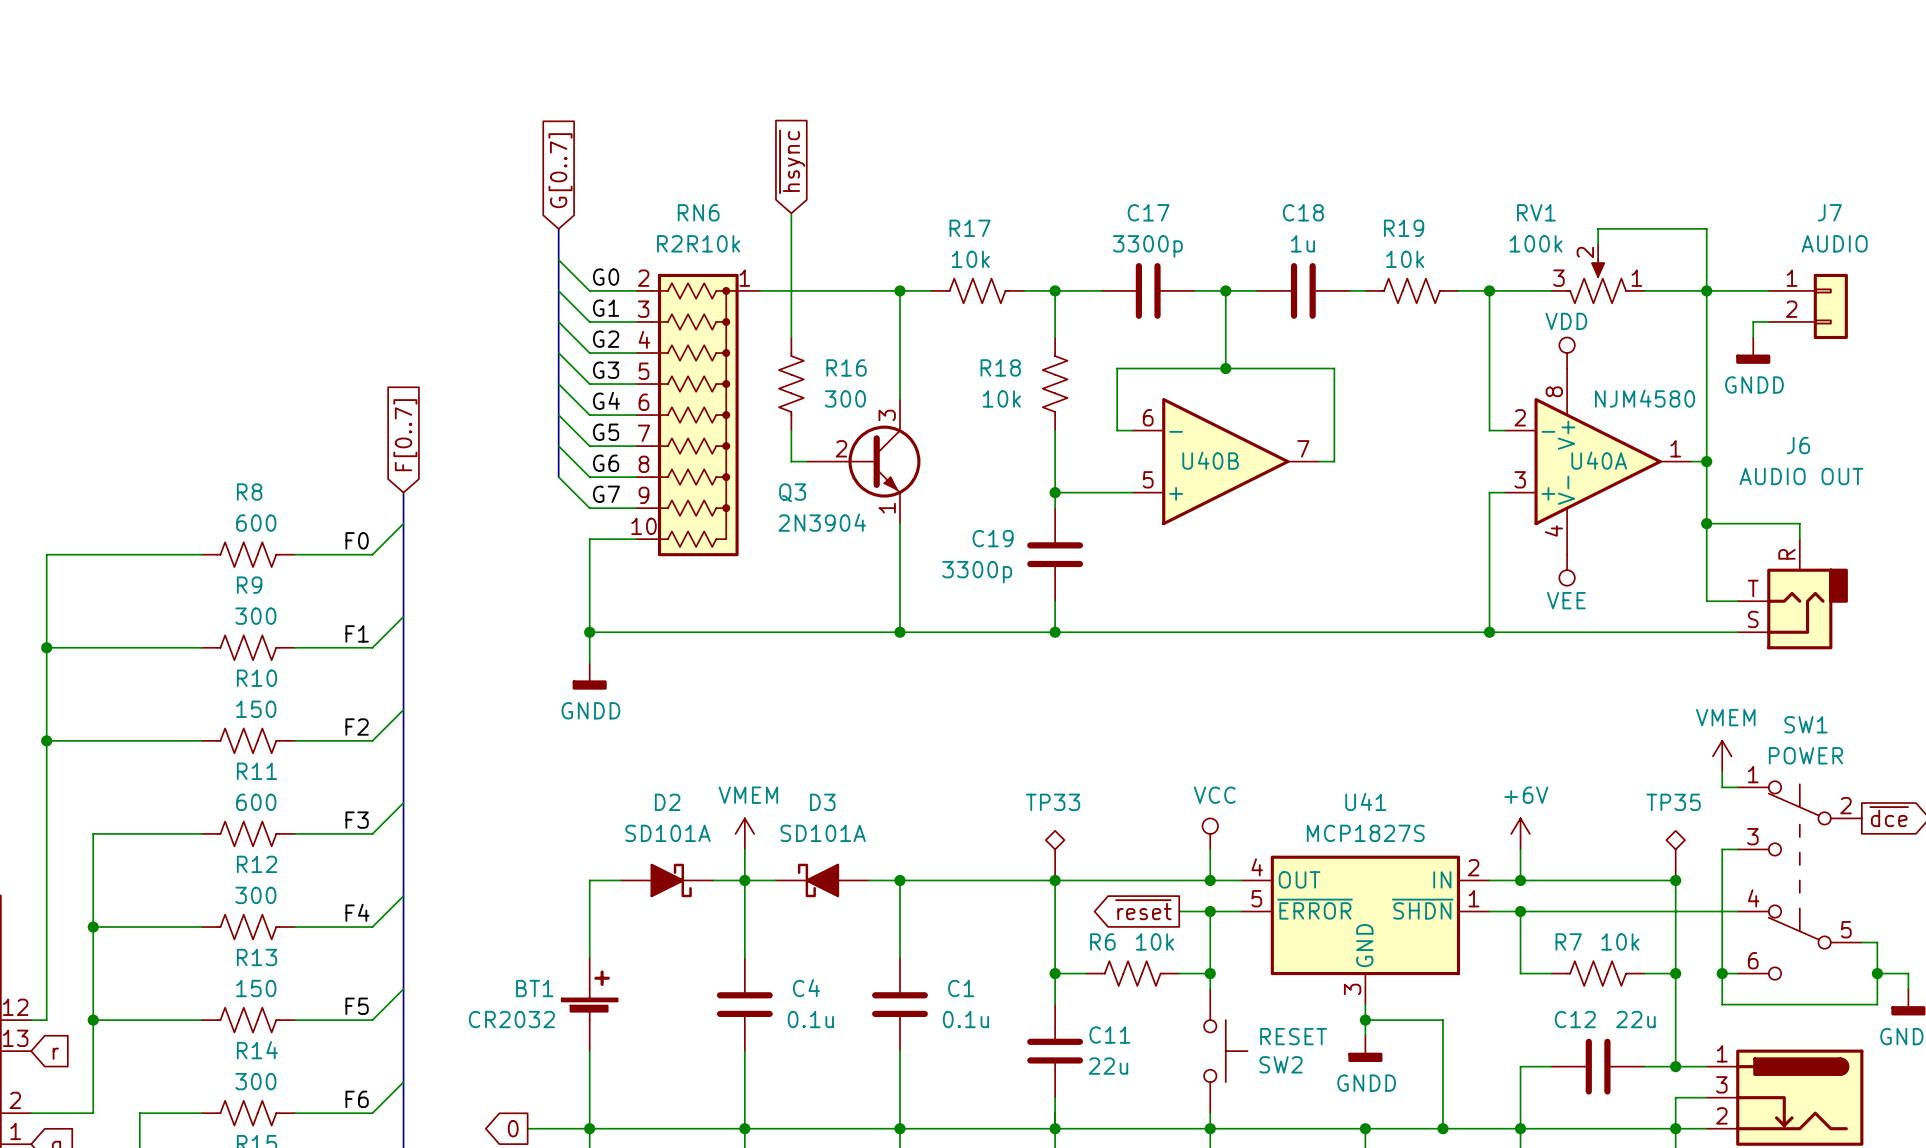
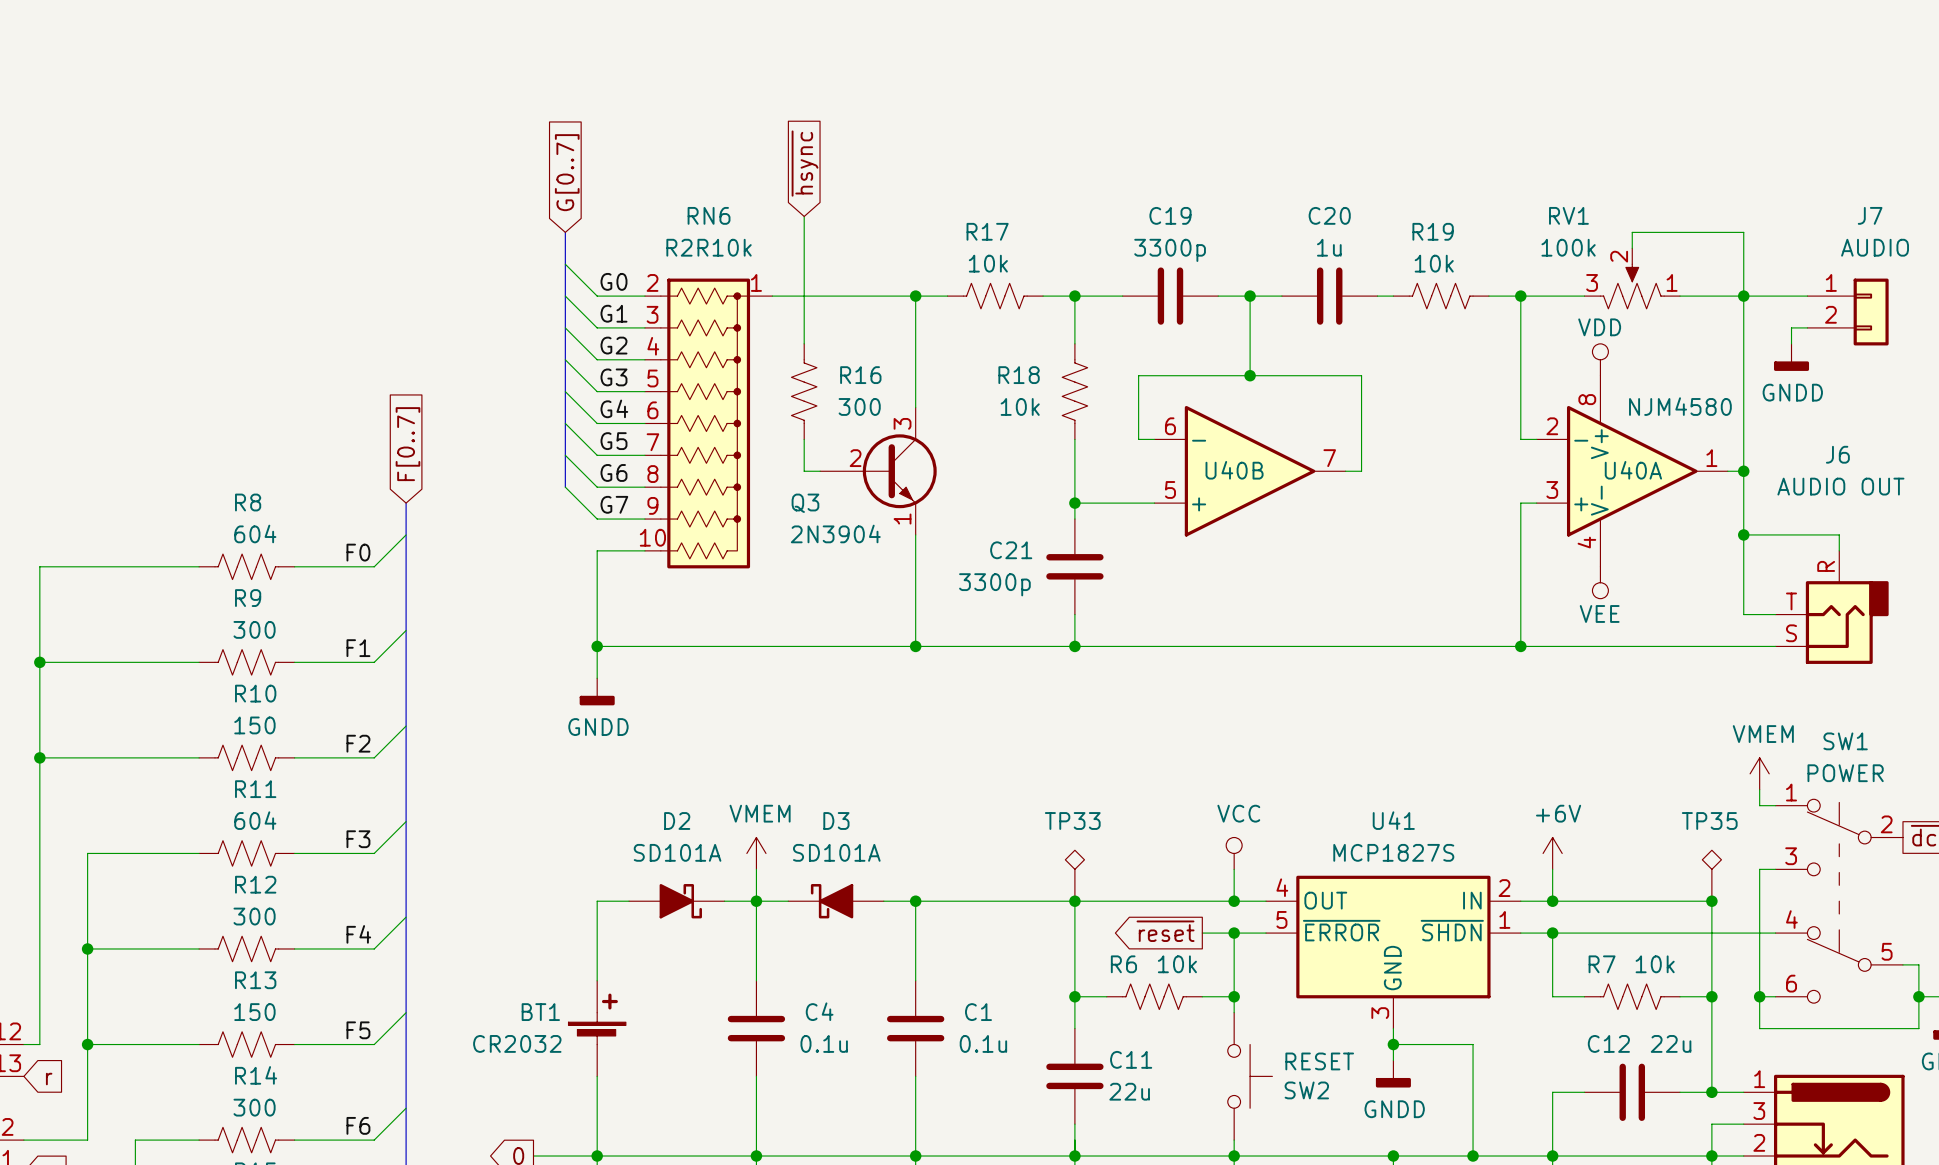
C17 name: C17 (1148, 212) -> C19 (1170, 215)
C18 name: C18 (1303, 212) -> C20 (1329, 215)
R8 value: 600 (256, 523) -> 604 (255, 533)
C19 name: C19 (993, 538) -> C21 (1011, 550)
R11 value: 600 (256, 802) -> 604 (255, 820)

